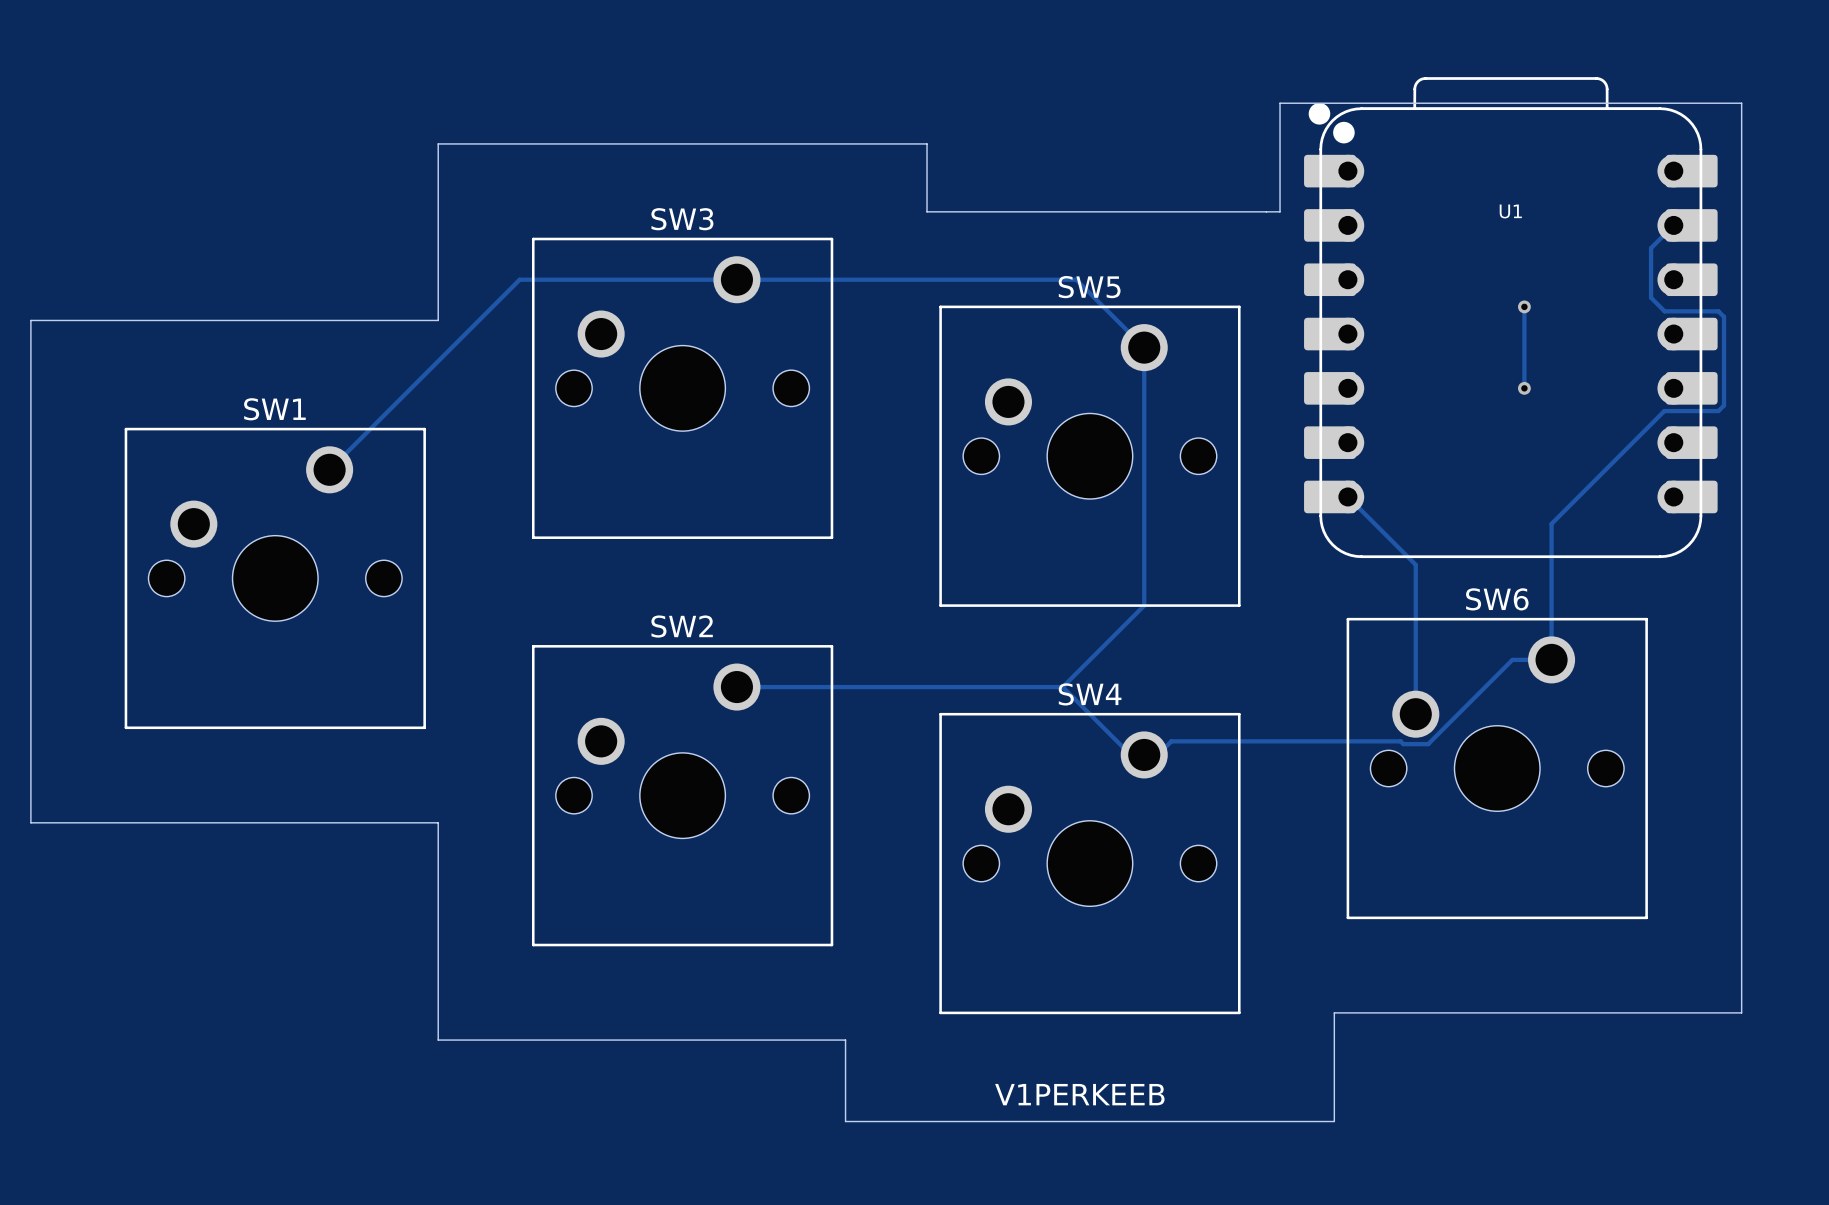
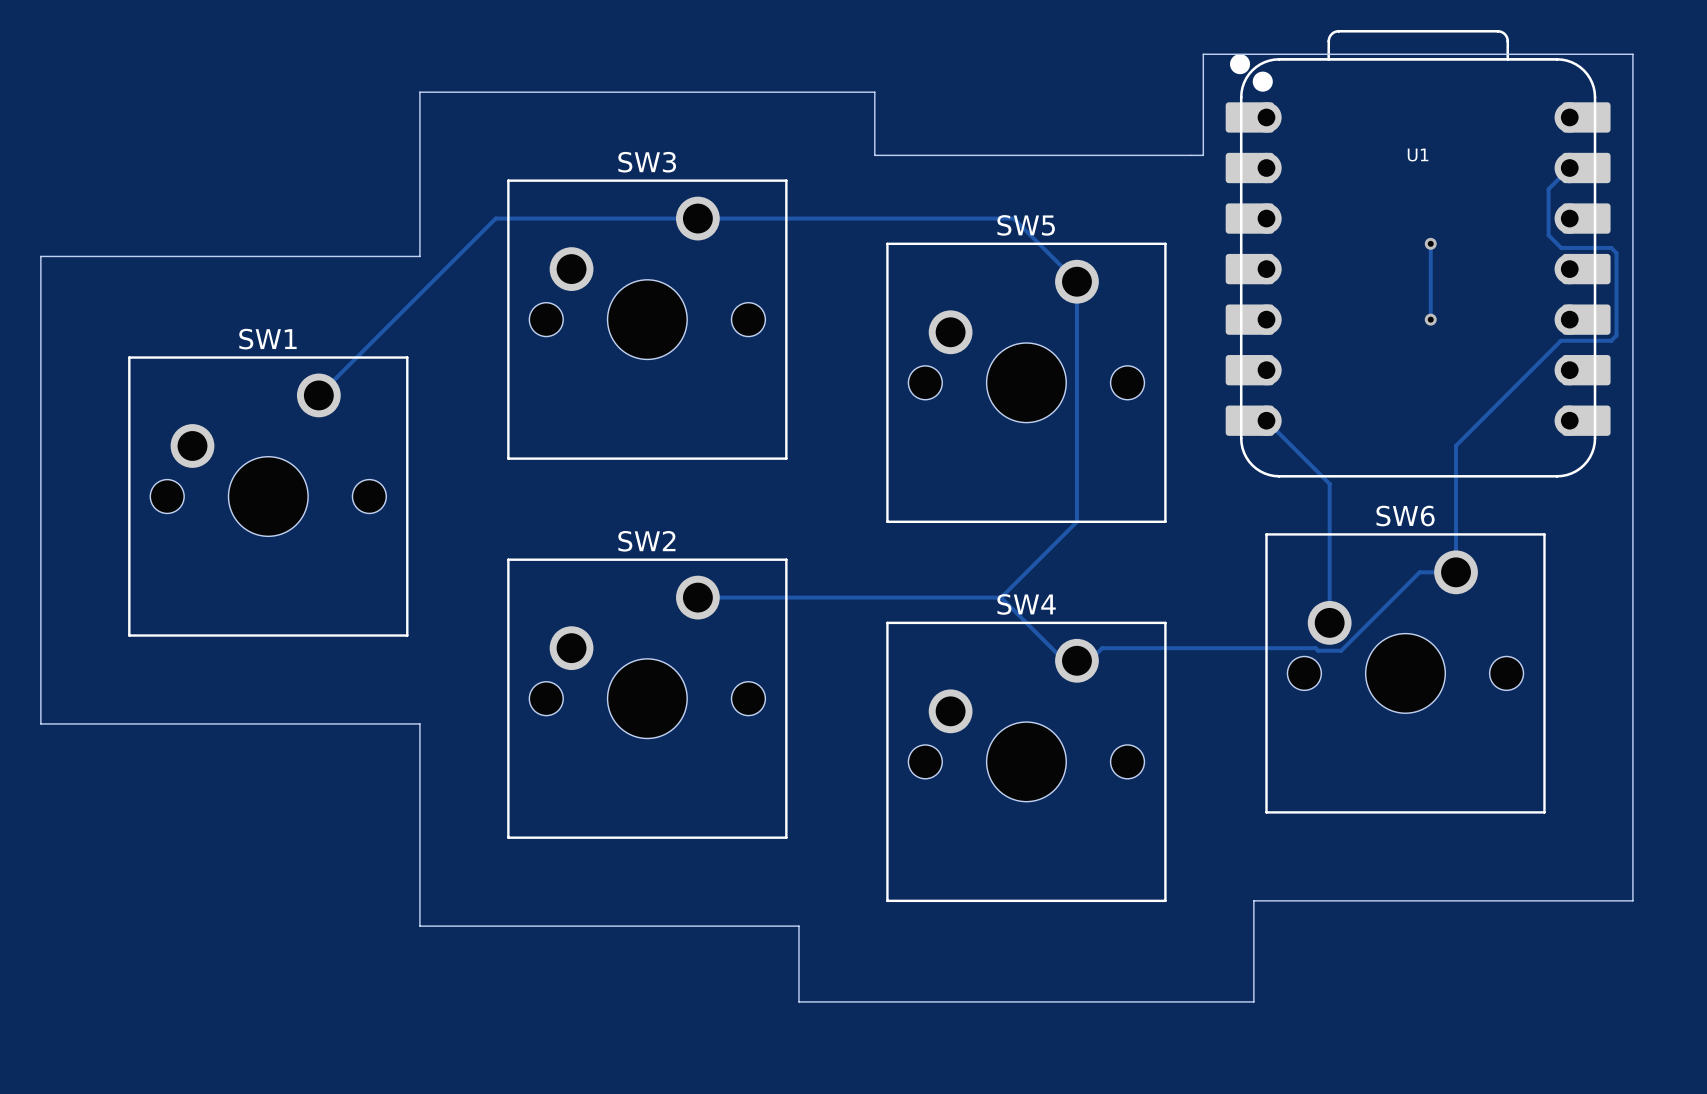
text: V1PERKEEB (1079, 1094) -> none

